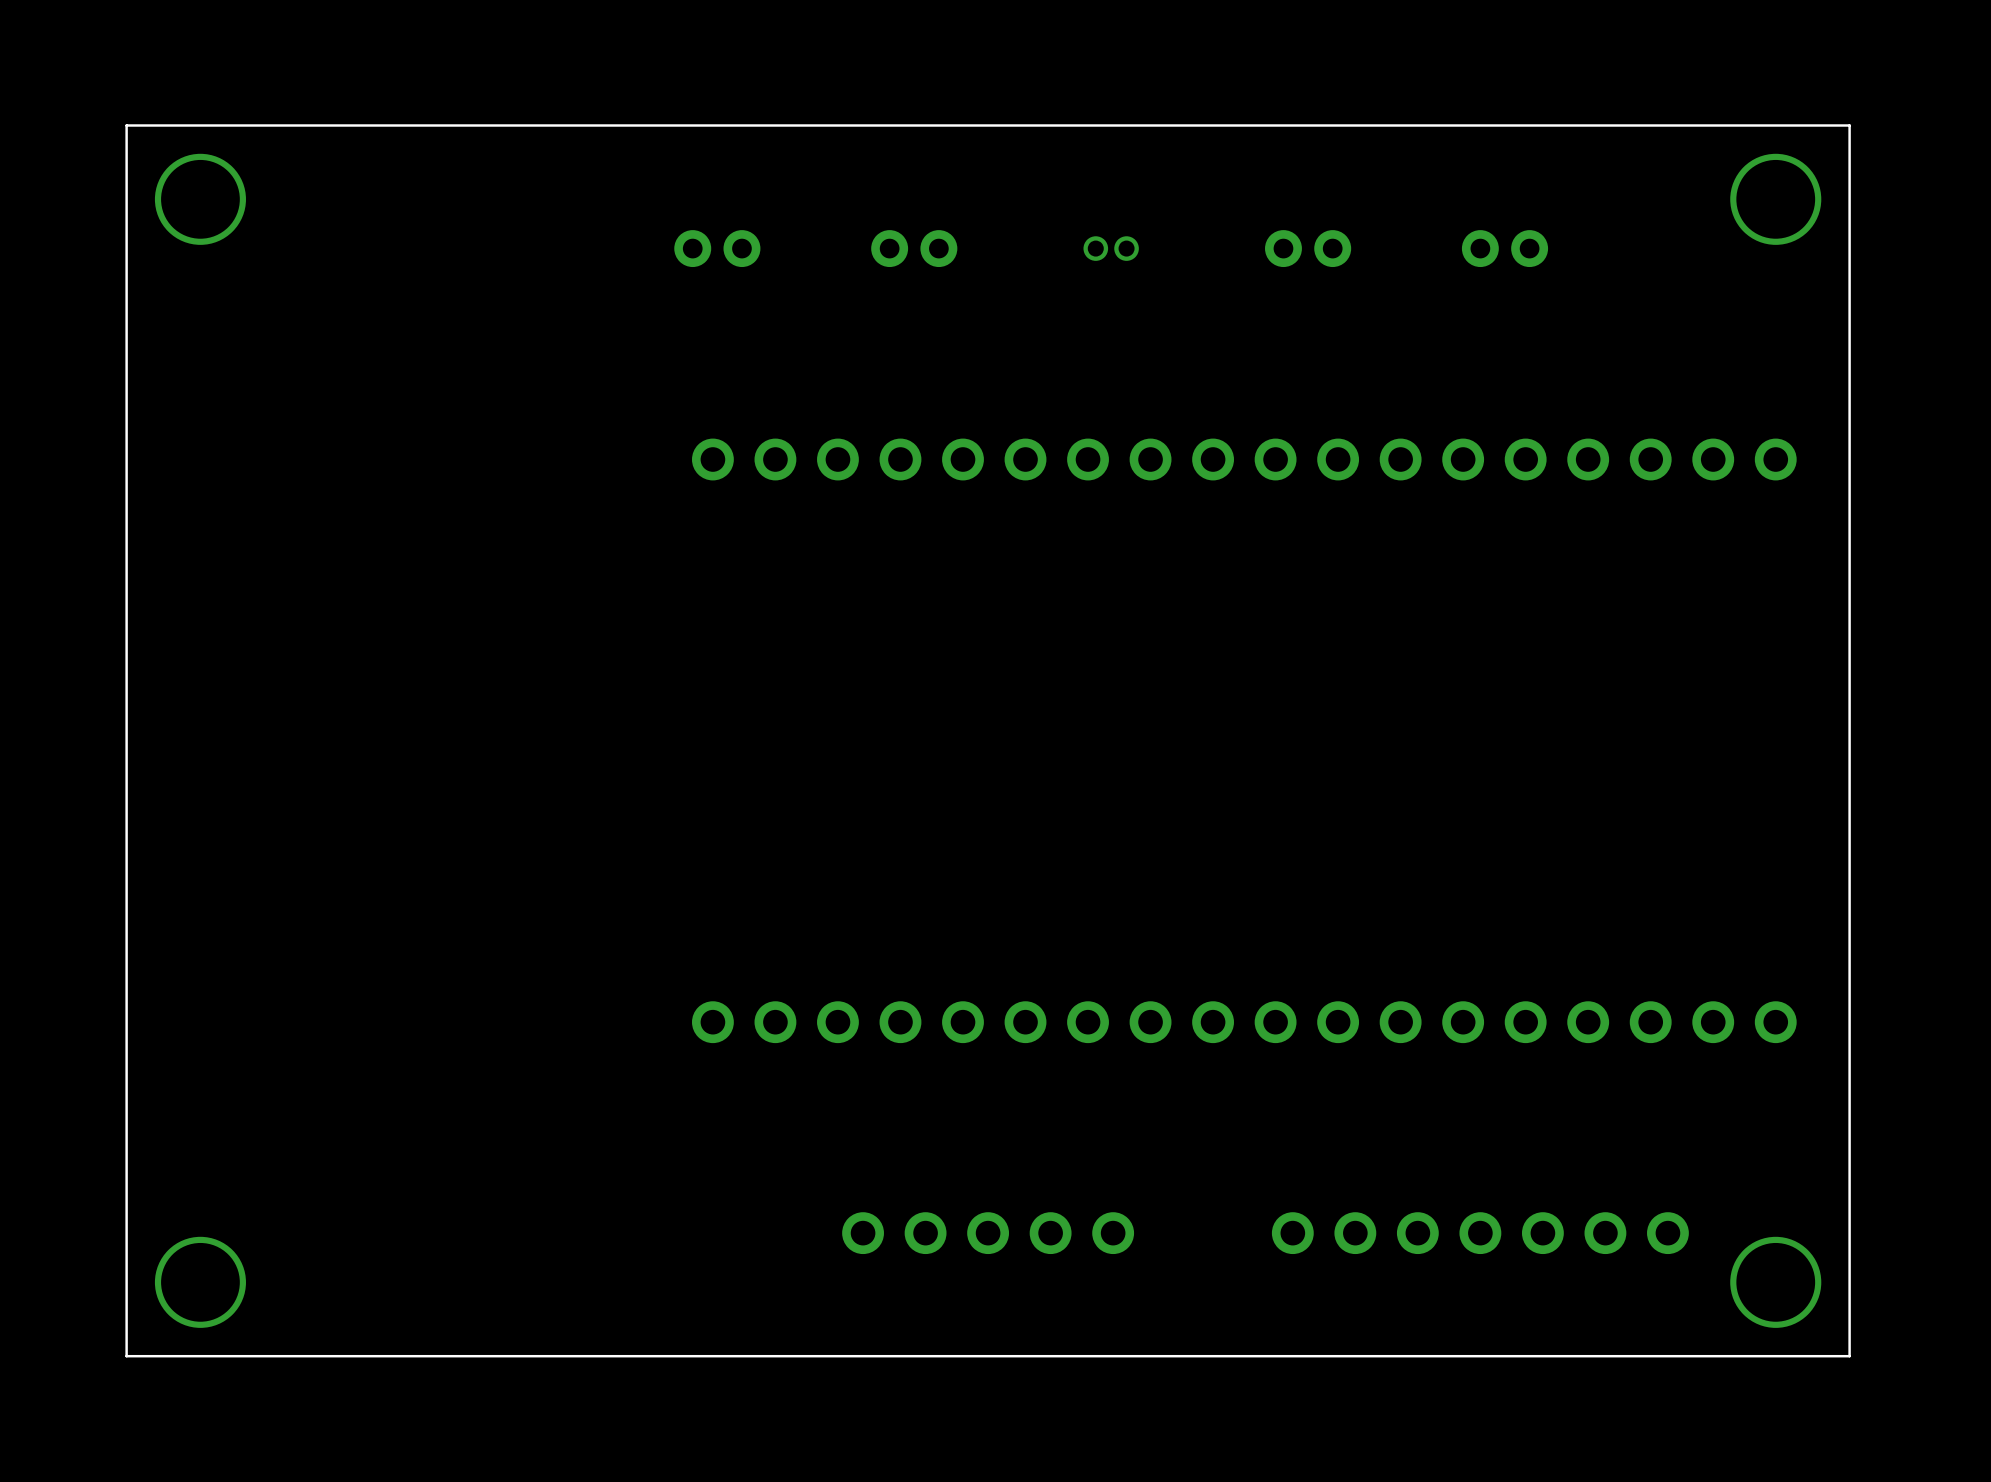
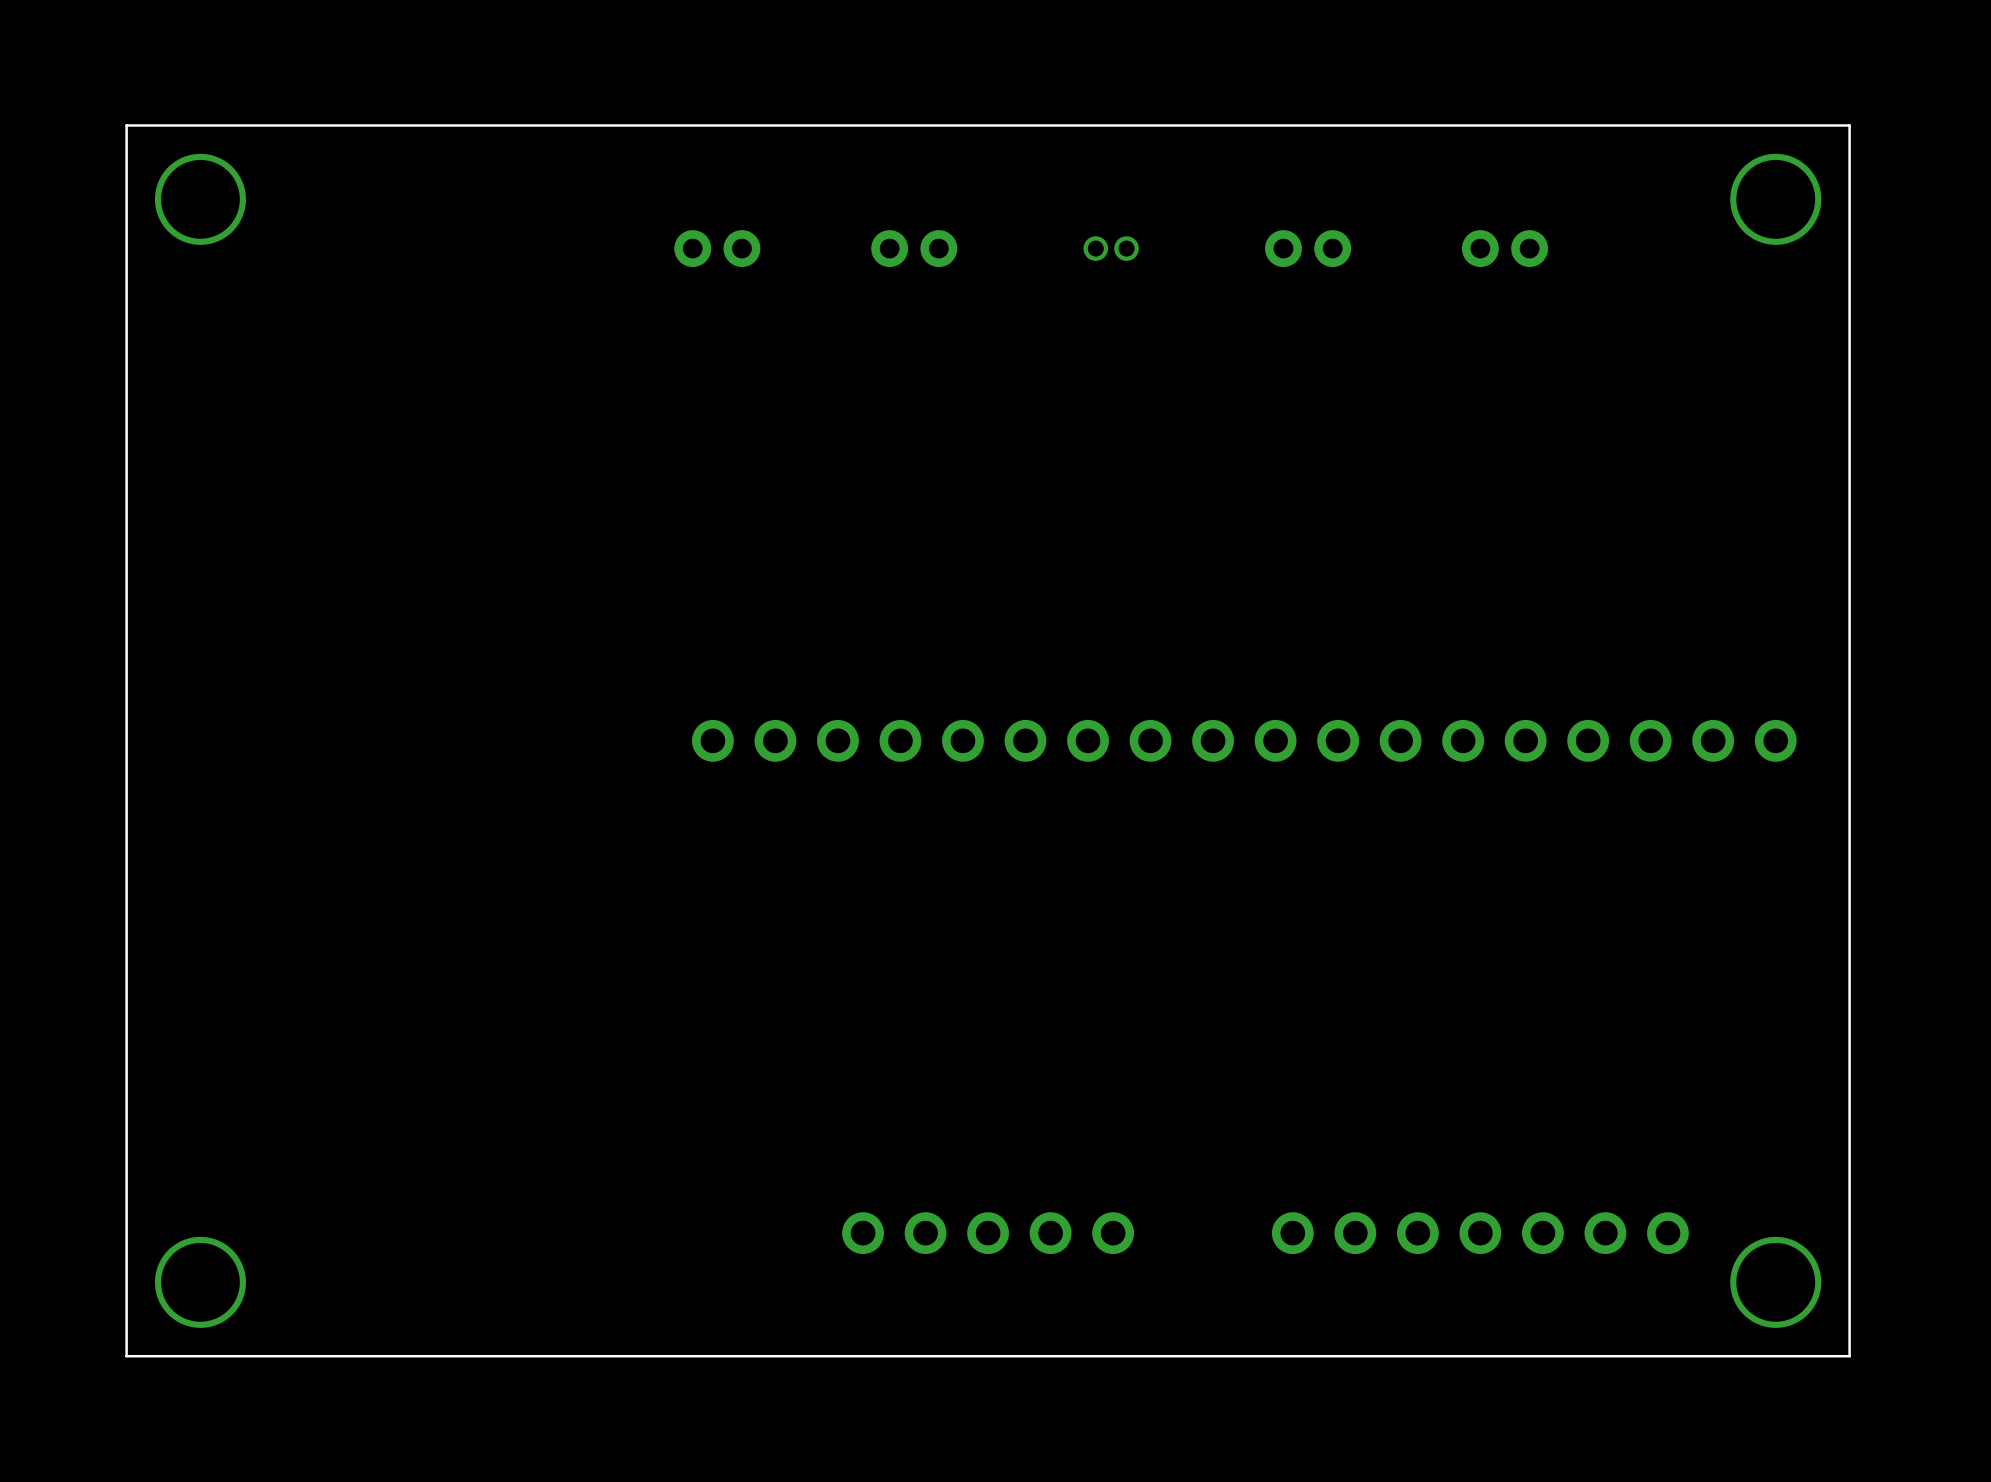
part: (1244, 459) -> none
part: none -> (1244, 740)
part: (1244, 1022) -> none

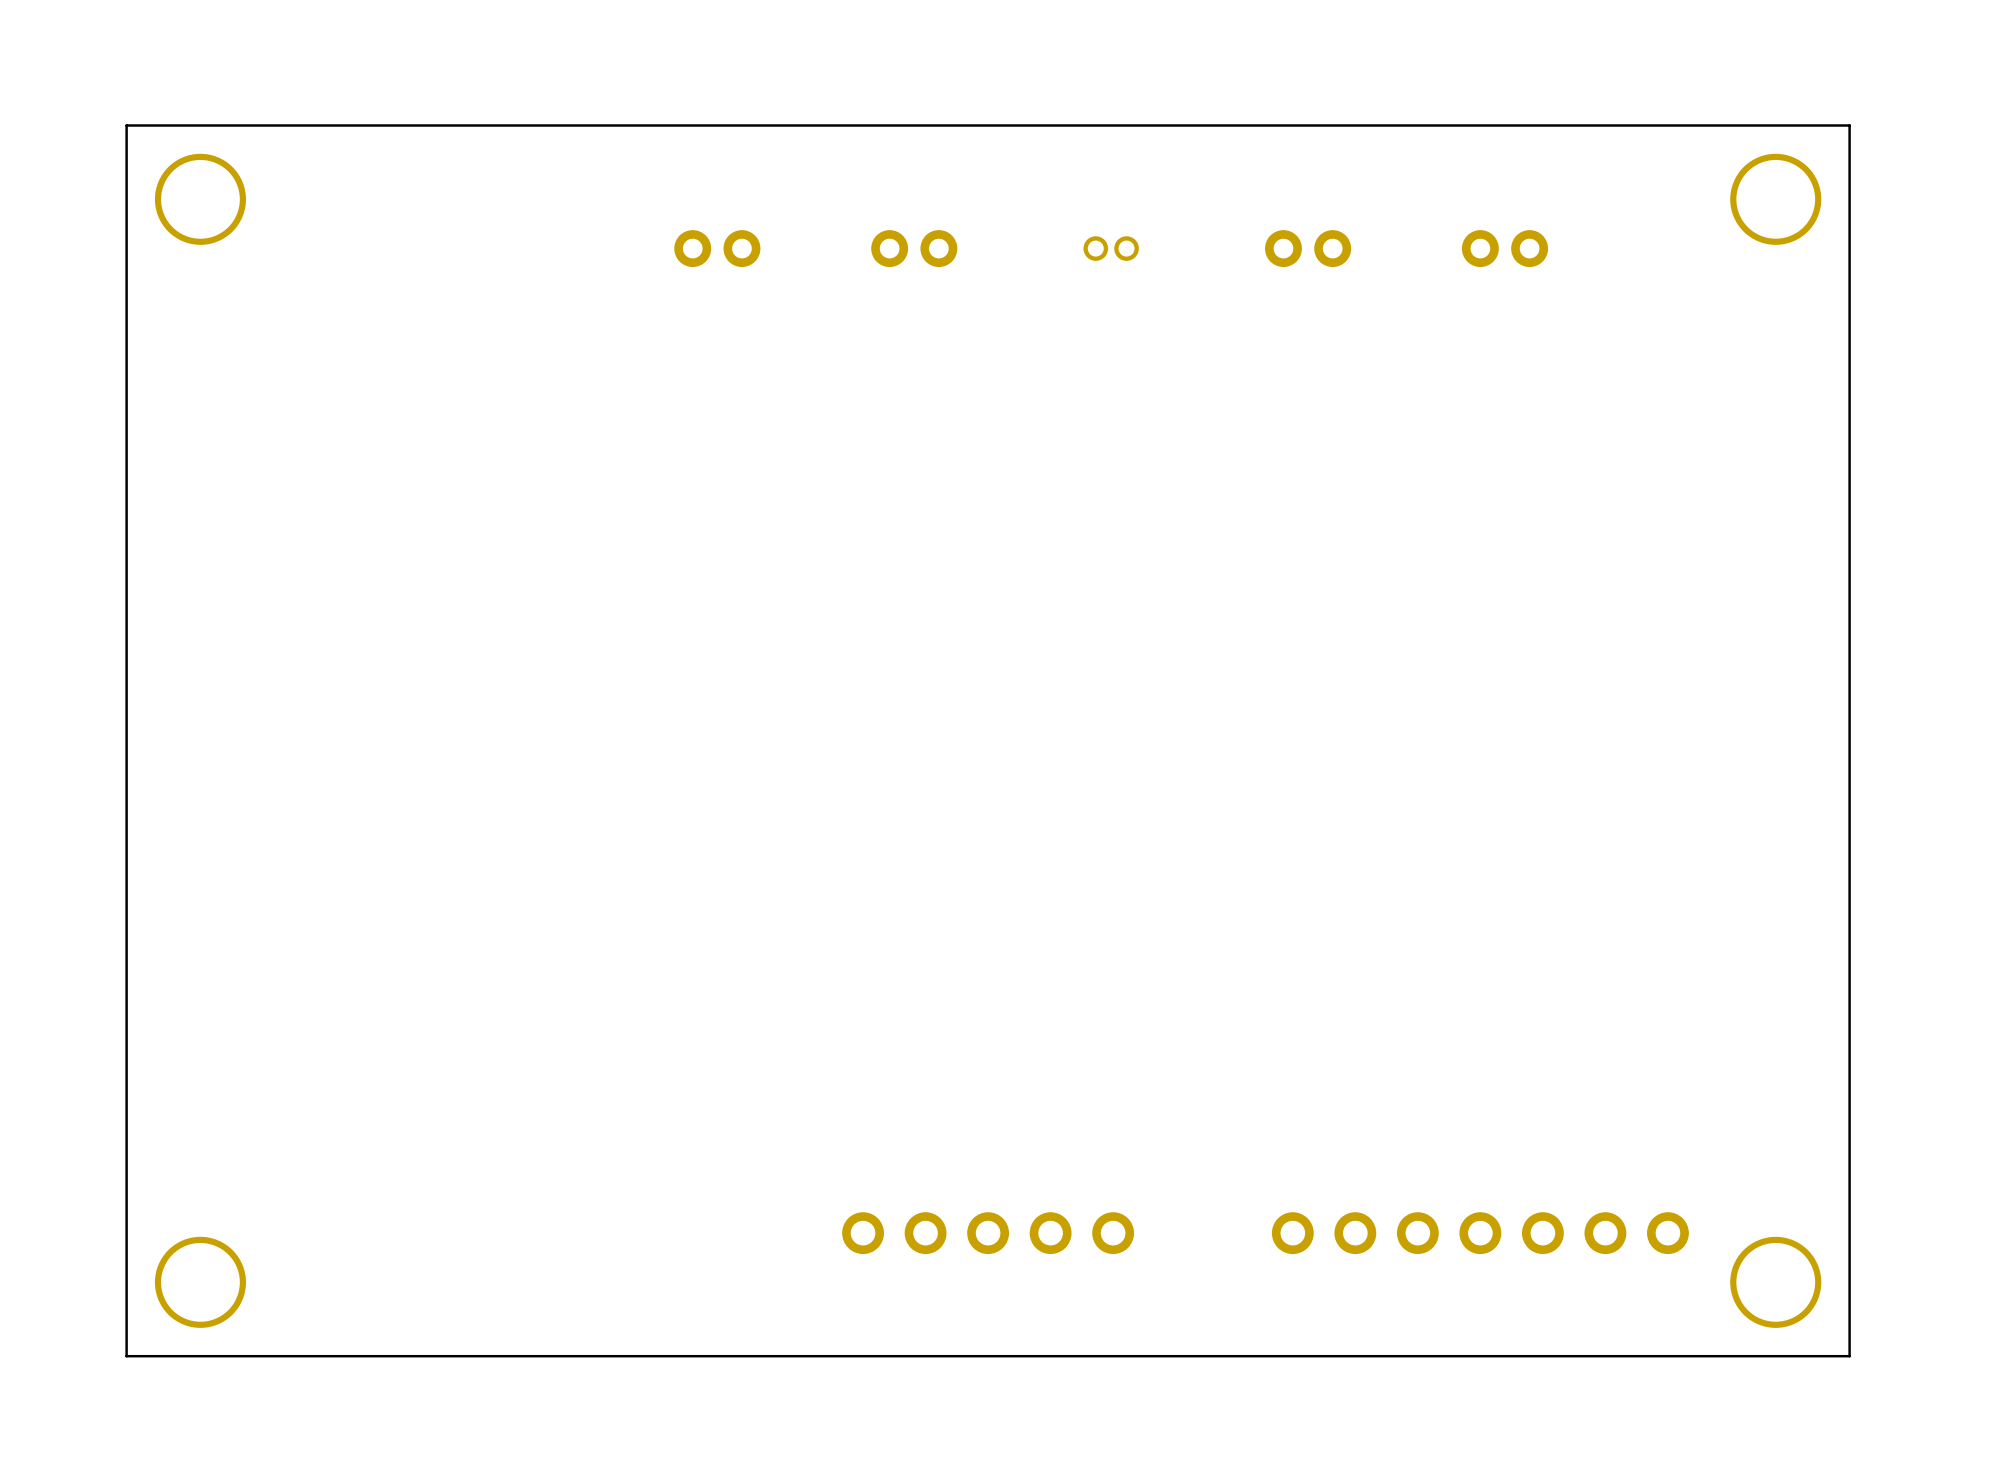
part: (1244, 740) -> none

